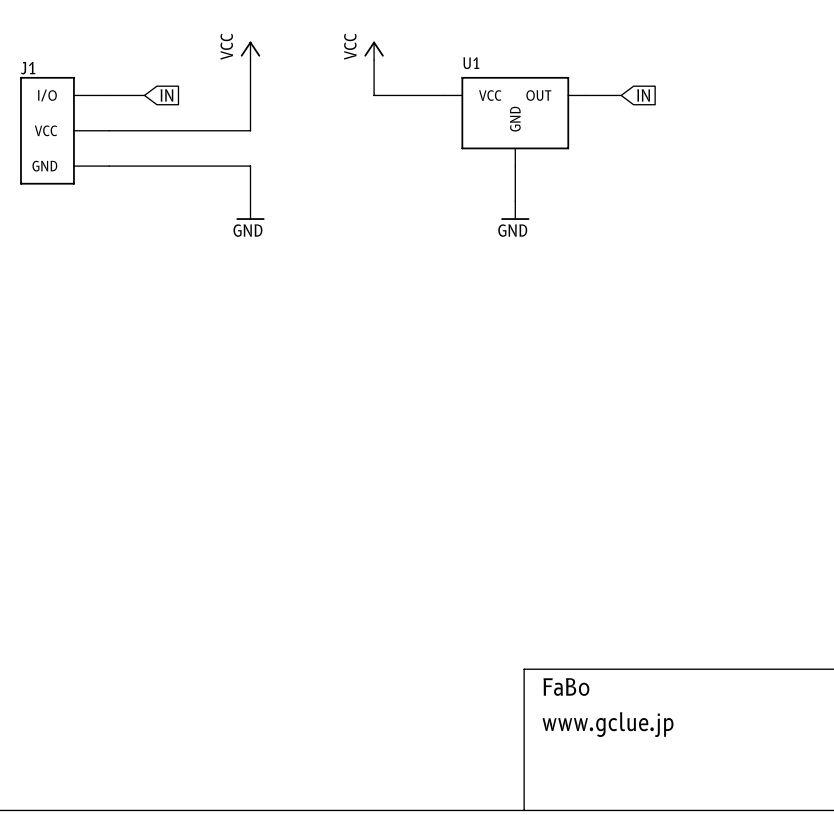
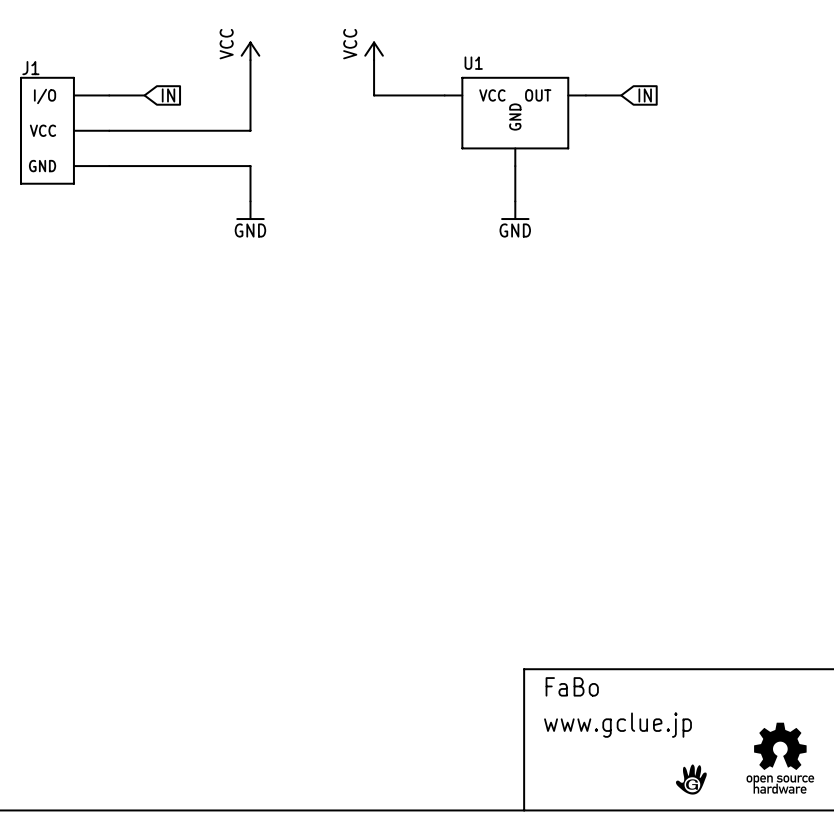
part: none -> (780, 758)
part: none -> (691, 779)

